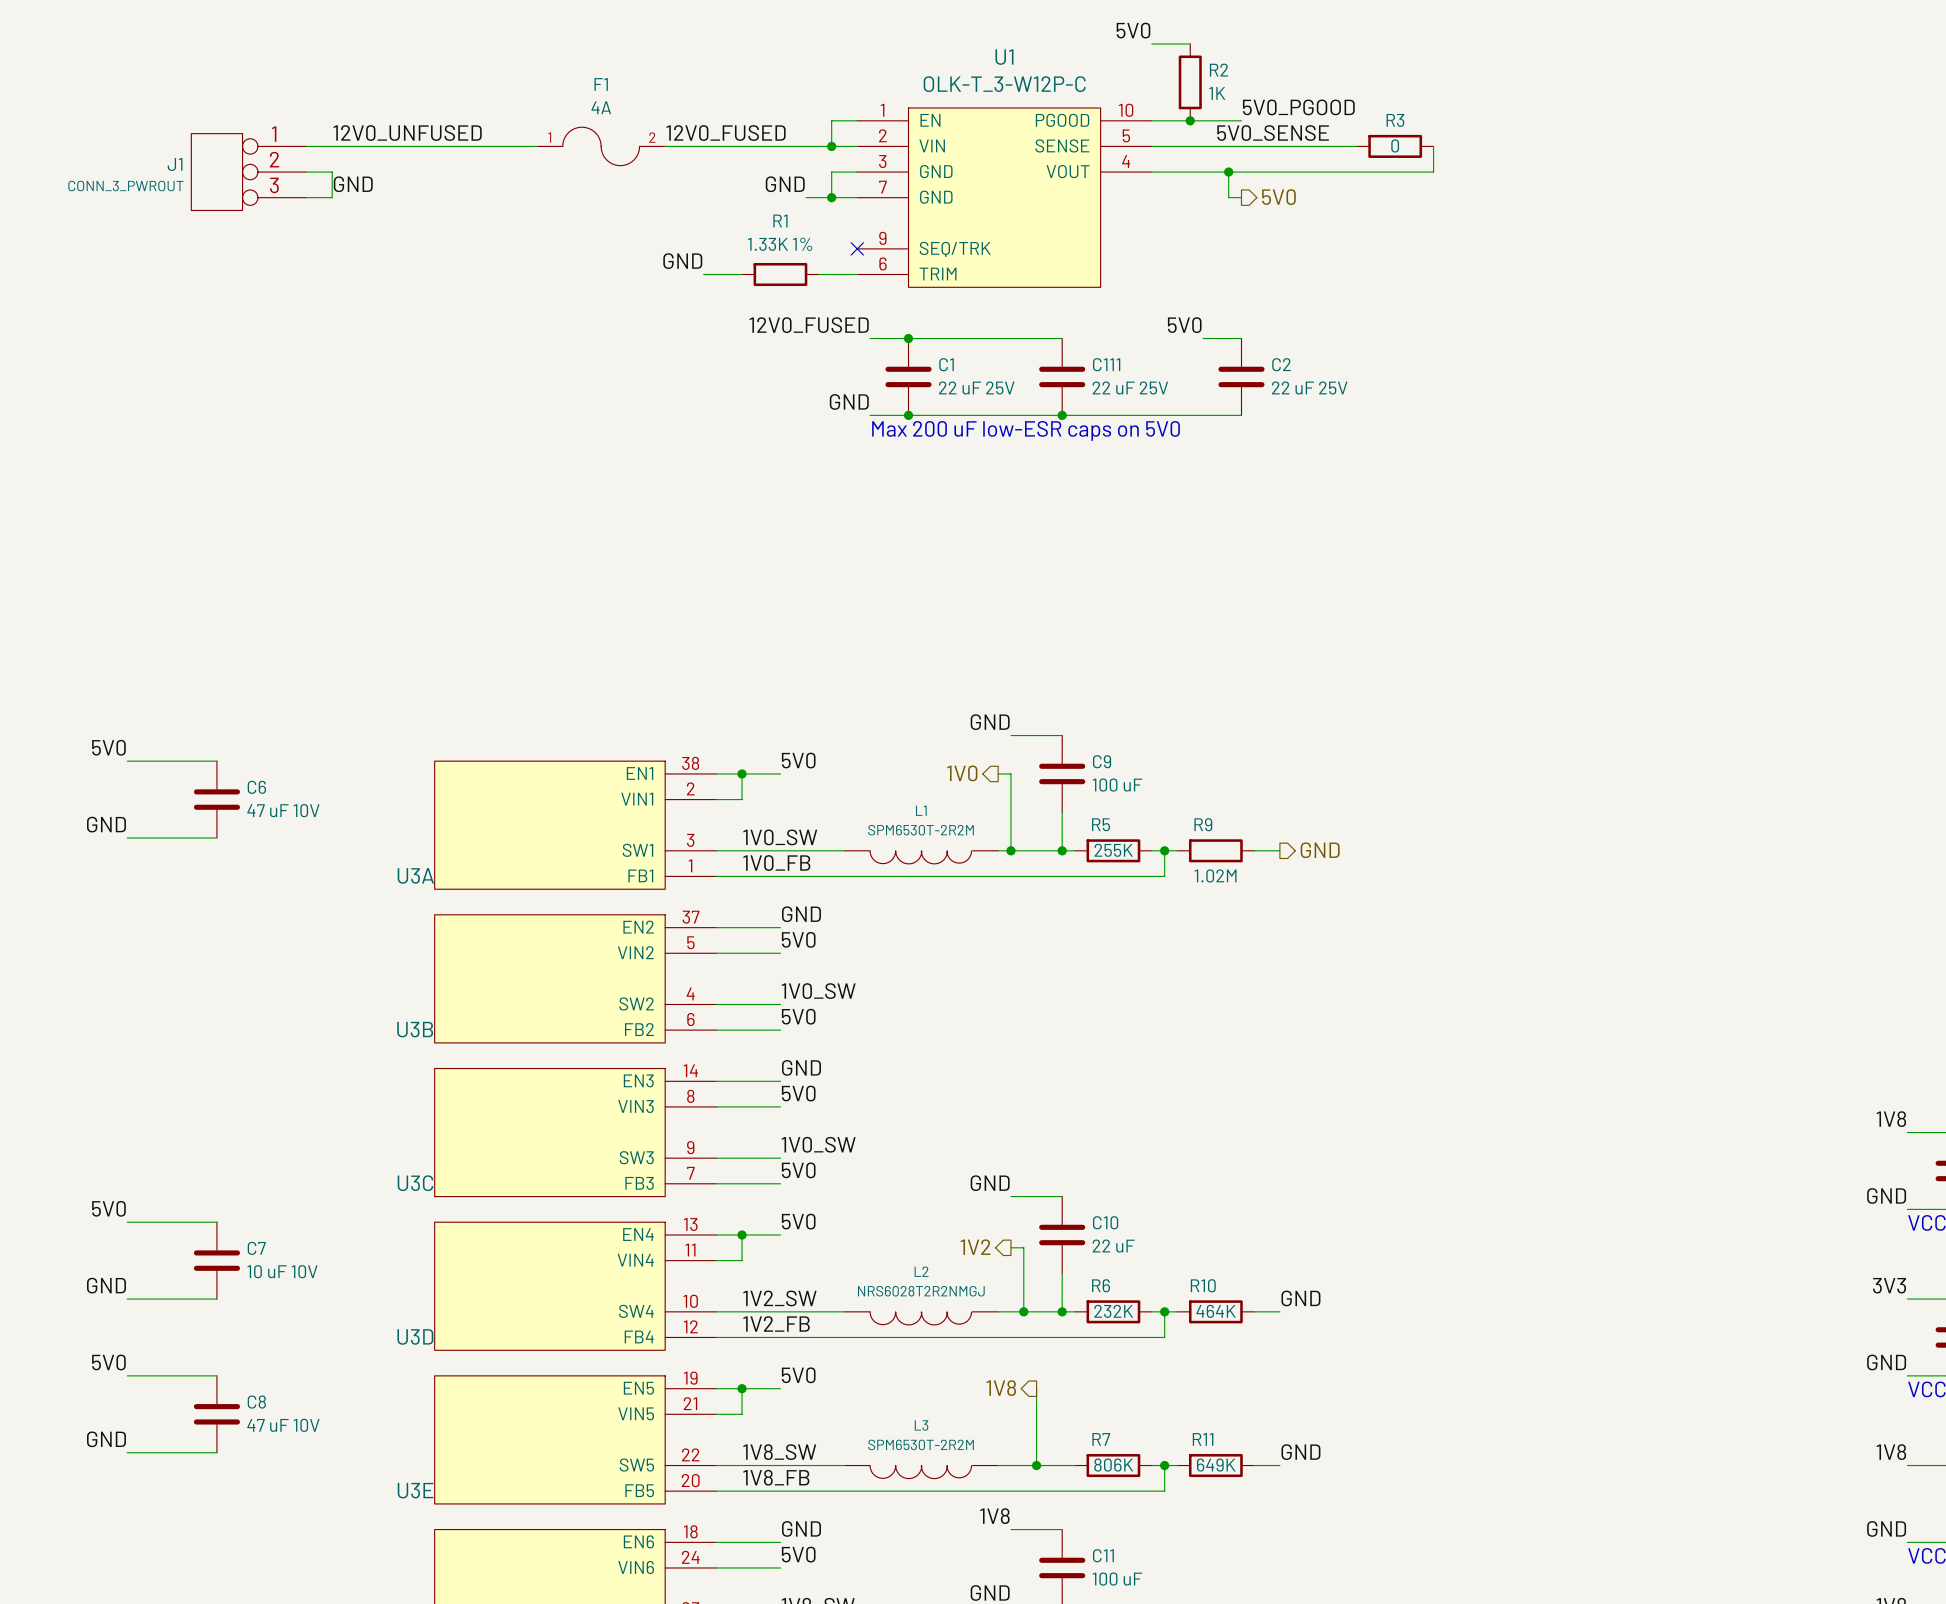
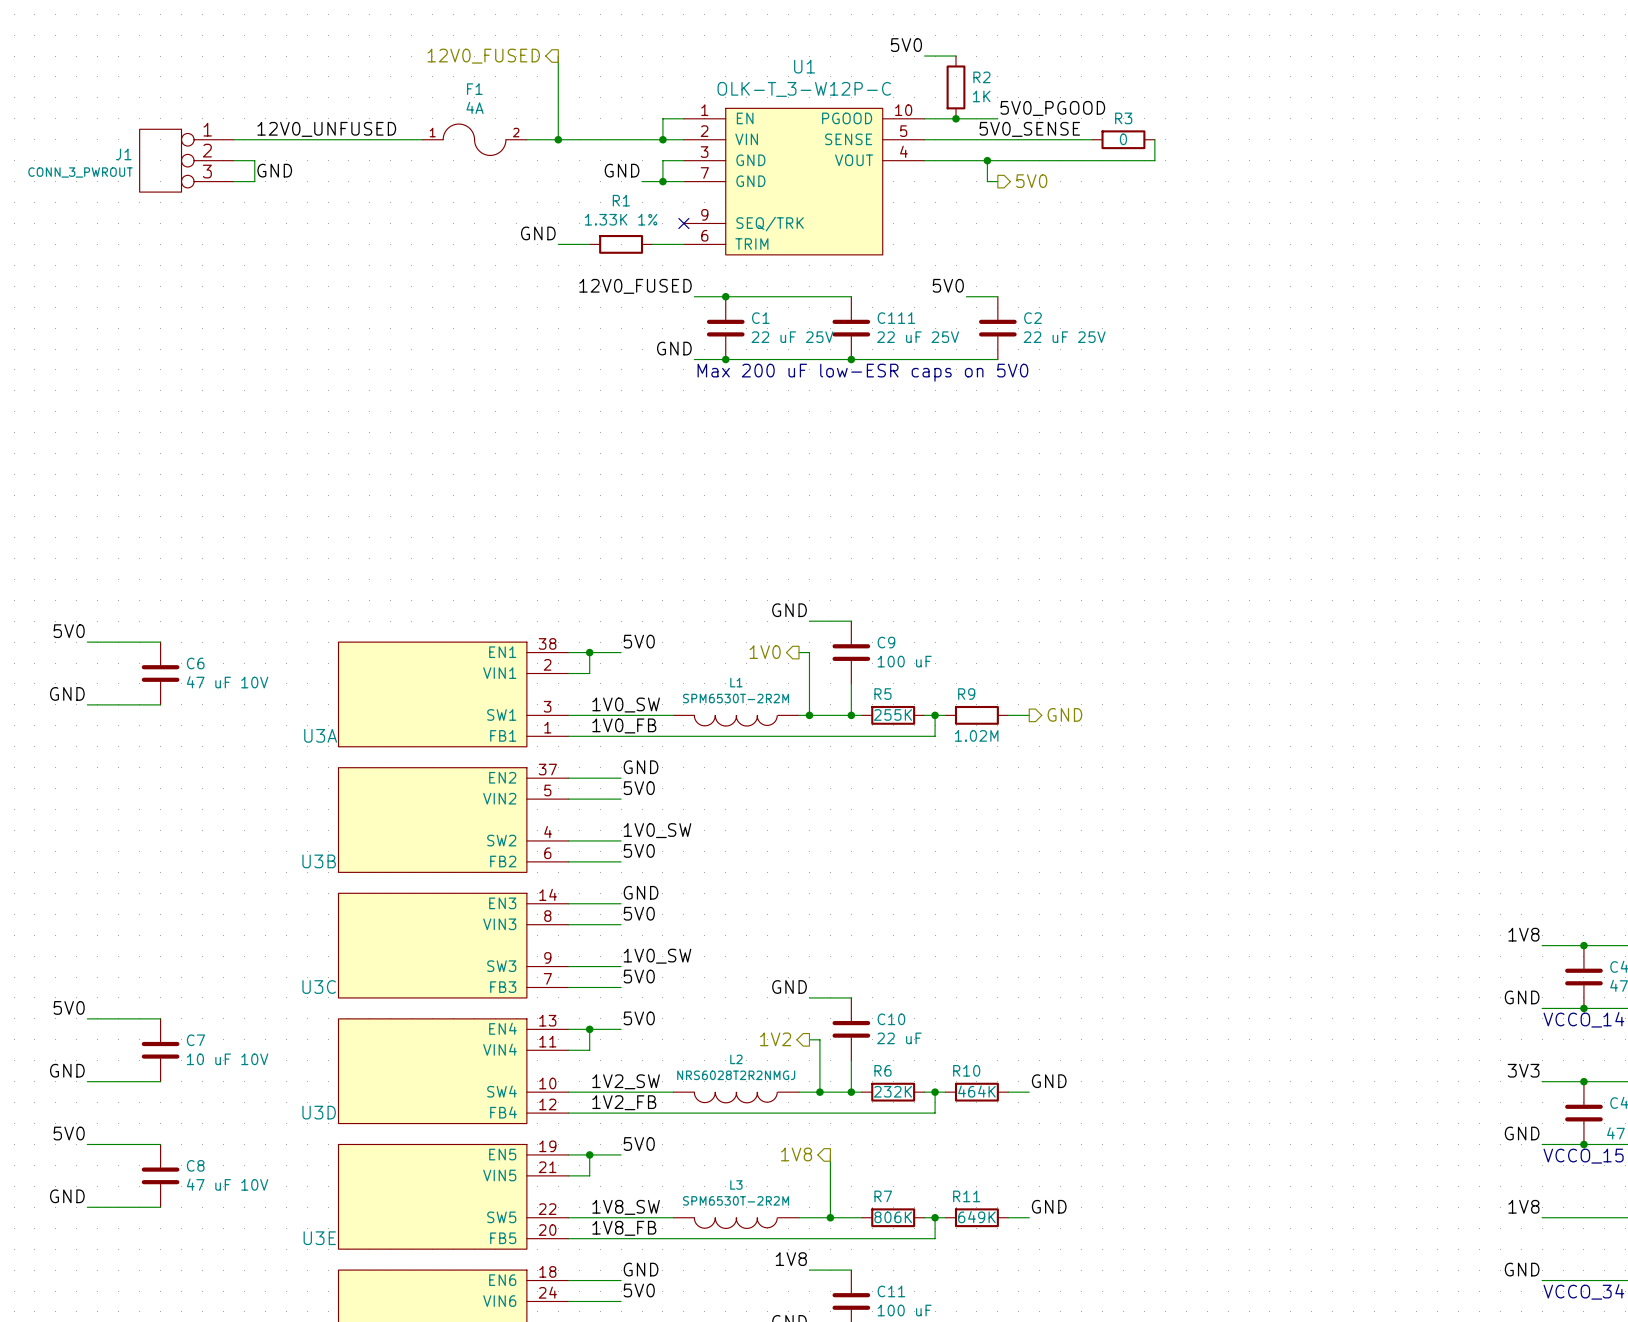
hierarchical label: none -> 12V0_FUSED (483, 56)
wire: none -> (558, 56) (558, 139)
label: 12V0_FUSED (726, 133) -> none
junction: none -> (558, 139)

